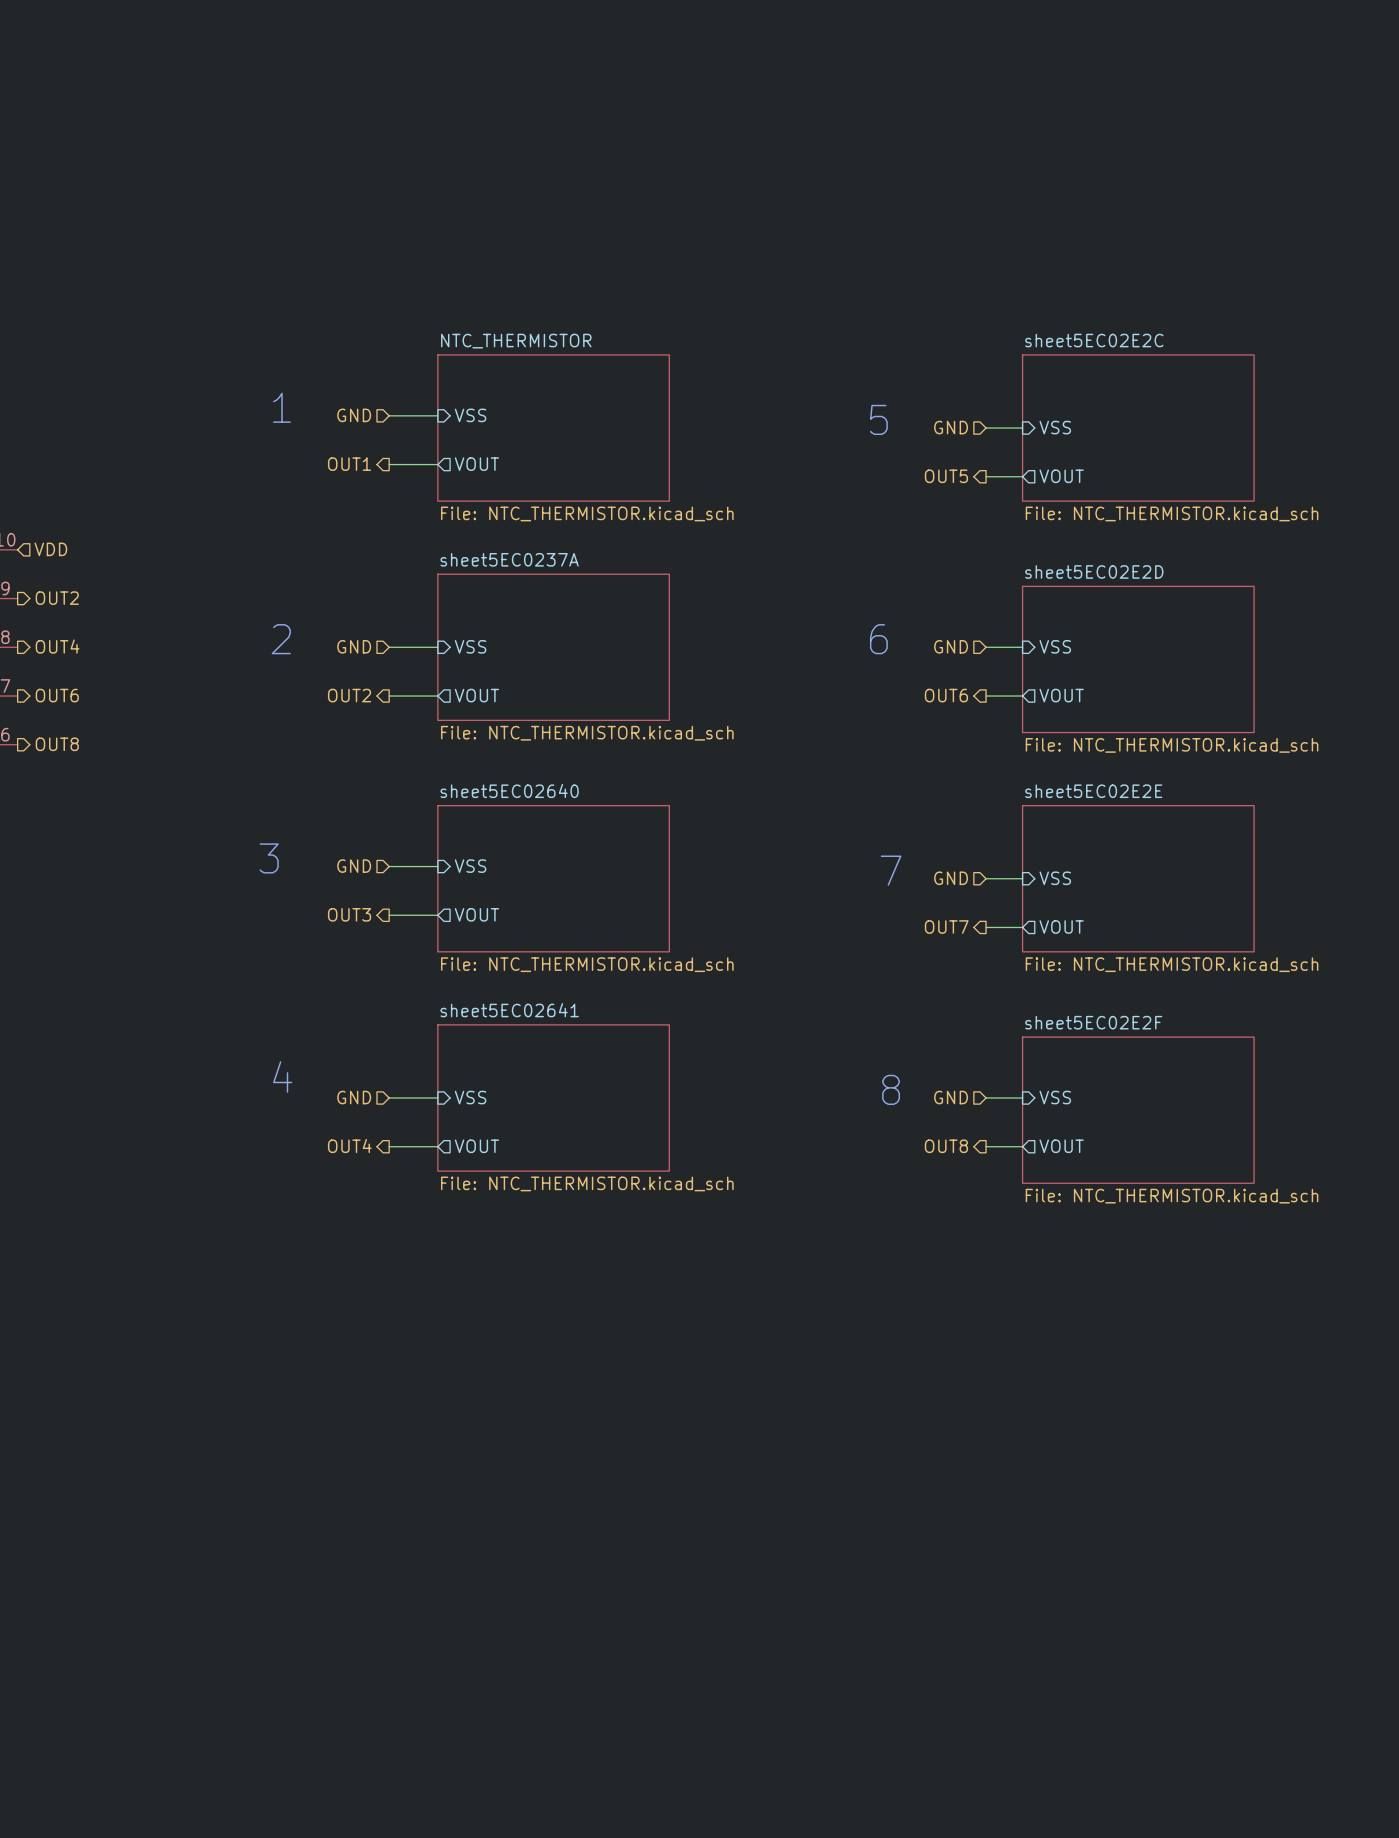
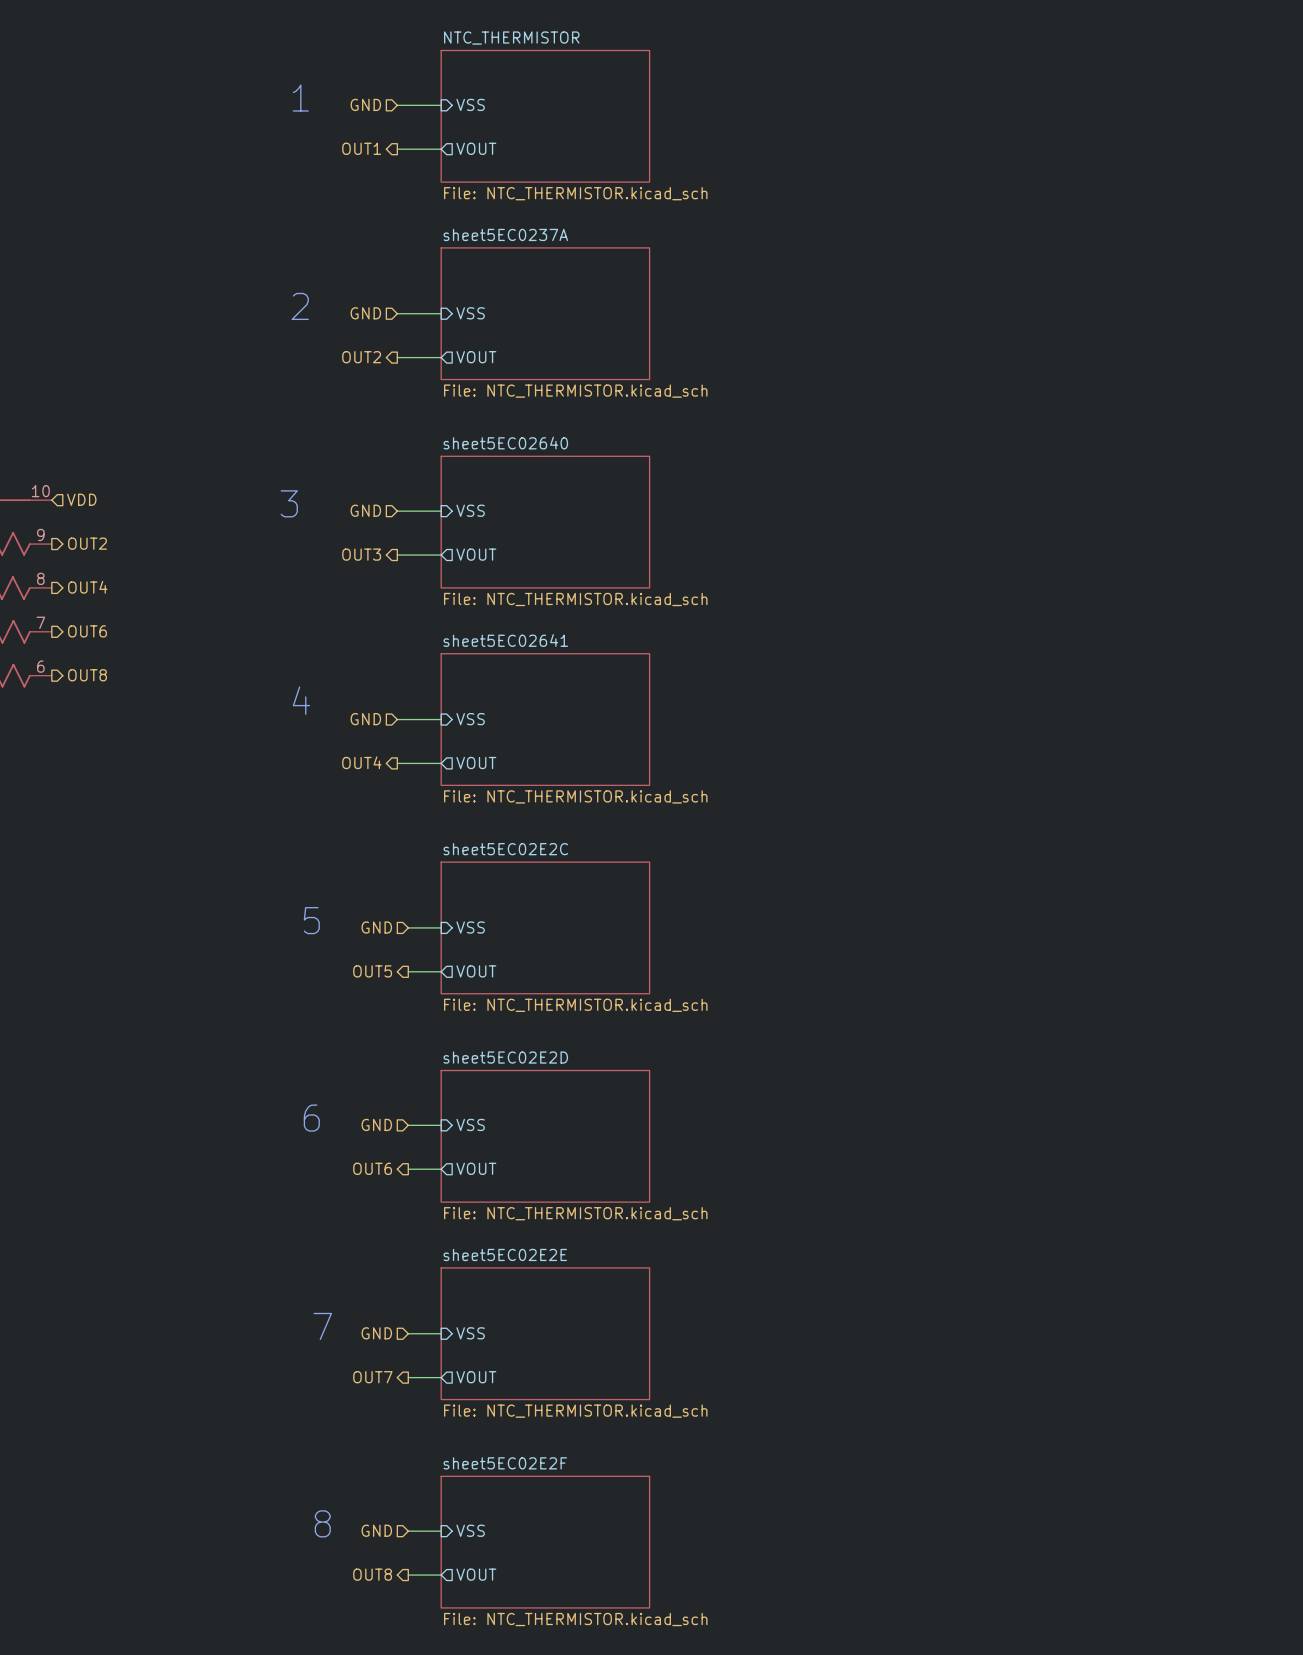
text: none -> 1 (300, 98)
hierarchical label: none -> GND (365, 104)
sheet pin: none -> VSS (470, 104)
wire: none -> (397, 105) (441, 105)
sheet NTC_THERMISTOR: none -> File: NTC_THERMISTOR.kicad_sch (545, 116)
hierarchical label: none -> OUT1 (361, 148)
sheet pin: none -> VOUT (476, 148)
wire: none -> (397, 149) (441, 149)
text: none -> 2 (300, 306)
hierarchical label: none -> GND (365, 313)
sheet pin: none -> VSS (470, 313)
hierarchical label: none -> OUT2 (361, 357)
sheet pin: none -> VOUT (476, 357)
text: 1 (282, 407) -> none
hierarchical label: GND (354, 415) -> none
wire: (389, 415) (437, 415) -> (397, 313) (441, 313)
sheet pin: VSS (470, 415) -> none
text: 5 (878, 419) -> none
hierarchical label: GND (951, 427) -> none
sheet pin: VSS (1055, 427) -> none
sheet NTC_THERMISTOR: File: NTC_THERMISTOR.kicad_sch (553, 428) -> none
wire: (986, 428) (1022, 428) -> none
sheet sheet5EC02E2C position: (1138, 428) -> (545, 927)
hierarchical label: OUT1 (349, 464) -> none
wire: (389, 464) (437, 464) -> (397, 357) (441, 357)
sheet pin: VOUT (476, 464) -> none
hierarchical label: OUT5 (946, 476) -> none
wire: (986, 476) (1022, 476) -> none
sheet pin: VOUT (1061, 476) -> none
text: none -> 3 (289, 503)
hierarchical label: none -> GND (365, 510)
sheet pin: none -> VSS (470, 510)
hierarchical label: none -> OUT3 (361, 554)
sheet pin: none -> VOUT (476, 554)
text: 2 (281, 639) -> none
text: 6 (878, 639) -> none
hierarchical label: GND (354, 646) -> none
sheet pin: VSS (470, 646) -> none
hierarchical label: GND (951, 646) -> none
sheet pin: VSS (1055, 646) -> none
wire: (389, 647) (437, 647) -> (397, 511) (441, 511)
sheet sheet5EC0237A position: (553, 647) -> (545, 313)
wire: (986, 647) (1022, 647) -> none
sheet sheet5EC02E2D position: (1138, 659) -> (545, 1136)
hierarchical label: OUT2 (349, 695) -> none
sheet pin: VOUT (476, 695) -> none
hierarchical label: OUT6 (946, 695) -> none
sheet pin: VOUT (1061, 695) -> none
wire: (389, 696) (437, 696) -> (397, 555) (441, 555)
wire: (986, 696) (1022, 696) -> none
text: none -> 4 (301, 700)
hierarchical label: none -> GND (365, 719)
sheet pin: none -> VSS (470, 719)
hierarchical label: none -> OUT4 (361, 762)
sheet pin: none -> VOUT (476, 763)
text: 3 (269, 858) -> none
hierarchical label: GND (354, 866) -> none
wire: (389, 866) (437, 866) -> (397, 719) (441, 719)
sheet pin: VSS (470, 866) -> none
text: 7 (891, 870) -> none
sheet sheet5EC02640 position: (553, 878) -> (545, 522)
hierarchical label: GND (951, 878) -> none
wire: (986, 878) (1022, 878) -> none
sheet pin: VSS (1055, 878) -> none
sheet sheet5EC02E2E position: (1138, 878) -> (545, 1333)
hierarchical label: OUT3 (349, 914) -> none
sheet pin: VOUT (476, 914) -> none
wire: (389, 915) (437, 915) -> (397, 763) (441, 763)
hierarchical label: OUT7 (946, 927) -> none
wire: (986, 927) (1022, 927) -> none
sheet pin: VOUT (1061, 927) -> none
text: none -> 5 (311, 920)
hierarchical label: none -> GND (376, 927)
wire: none -> (408, 927) (441, 927)
sheet pin: none -> VSS (470, 927)
hierarchical label: none -> OUT5 (372, 971)
wire: none -> (408, 971) (441, 971)
sheet pin: none -> VOUT (476, 971)
text: 4 (282, 1077) -> none
text: 8 (891, 1089) -> none
hierarchical label: GND (354, 1097) -> none
wire: (389, 1097) (437, 1097) -> none
sheet pin: VSS (470, 1097) -> none
sheet sheet5EC02641 position: (553, 1097) -> (545, 719)
hierarchical label: GND (951, 1097) -> none
wire: (986, 1097) (1022, 1097) -> none
sheet pin: VSS (1055, 1097) -> none
sheet sheet5EC02E2F position: (1138, 1110) -> (545, 1542)
hierarchical label: OUT4 (349, 1145) -> none
wire: (389, 1146) (437, 1146) -> none
sheet pin: VOUT (476, 1146) -> none
hierarchical label: OUT8 (946, 1146) -> none
wire: (986, 1146) (1022, 1146) -> none
sheet pin: VOUT (1061, 1146) -> none
text: none -> 6 (311, 1118)
hierarchical label: none -> GND (376, 1124)
sheet pin: none -> VSS (470, 1124)
wire: none -> (408, 1125) (441, 1125)
hierarchical label: none -> OUT6 (372, 1168)
wire: none -> (408, 1169) (441, 1169)
sheet pin: none -> VOUT (476, 1168)
text: none -> 7 (322, 1326)
hierarchical label: none -> GND (376, 1333)
wire: none -> (408, 1333) (441, 1333)
sheet pin: none -> VSS (470, 1333)
hierarchical label: none -> OUT7 (372, 1377)
sheet pin: none -> VOUT (476, 1377)
wire: none -> (408, 1377) (441, 1377)
text: none -> 8 (322, 1523)
hierarchical label: none -> GND (376, 1530)
wire: none -> (408, 1531) (441, 1531)
sheet pin: none -> VSS (470, 1530)
hierarchical label: none -> OUT8 (372, 1574)
wire: none -> (408, 1575) (441, 1575)
sheet pin: none -> VOUT (476, 1574)

